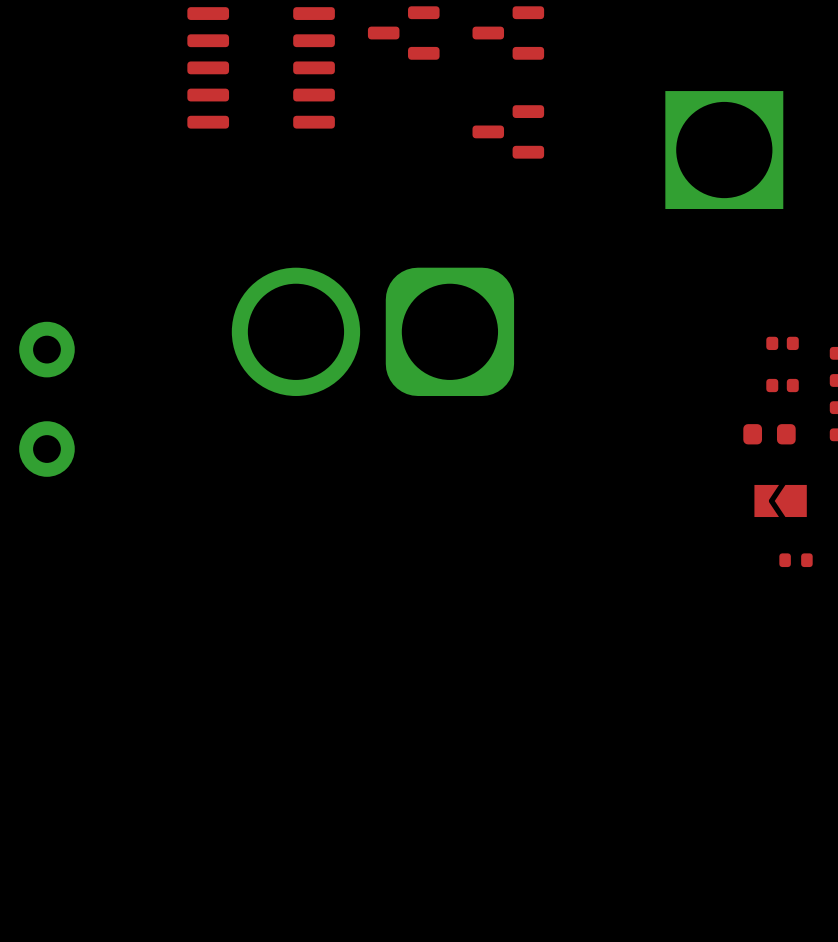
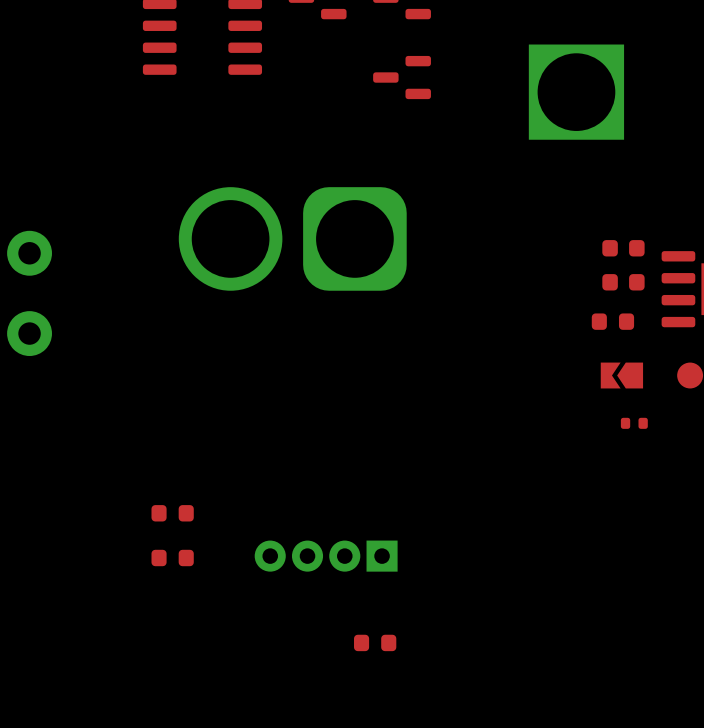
part footprint: [766, 336, 799, 351] -> [602, 240, 645, 257]
part footprint: [766, 378, 799, 393] -> [602, 274, 645, 291]
part: none -> (172, 513)
part: none -> (326, 556)
part: none -> (172, 558)
part: none -> (375, 642)

